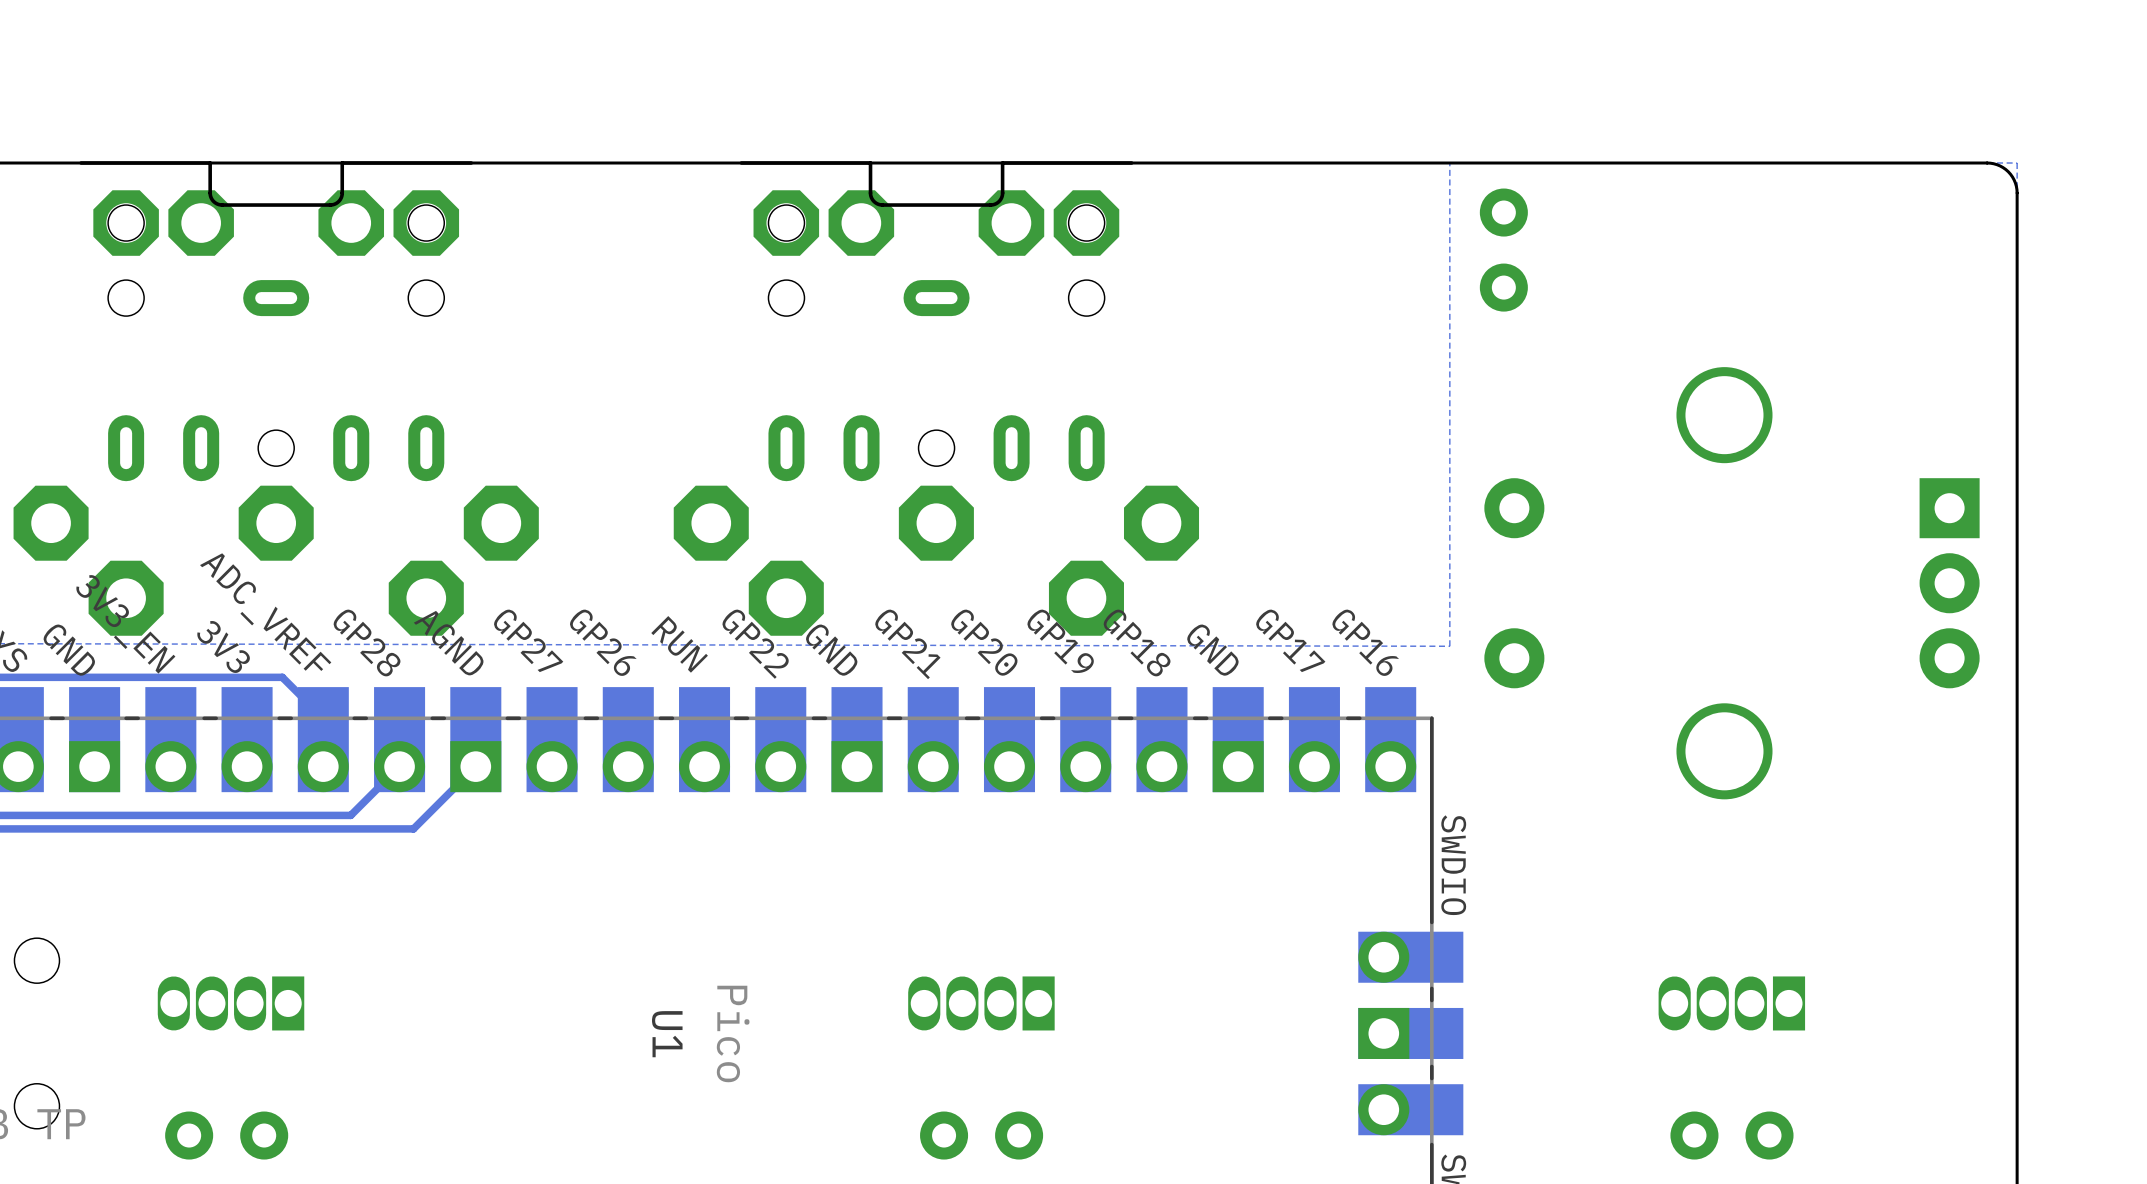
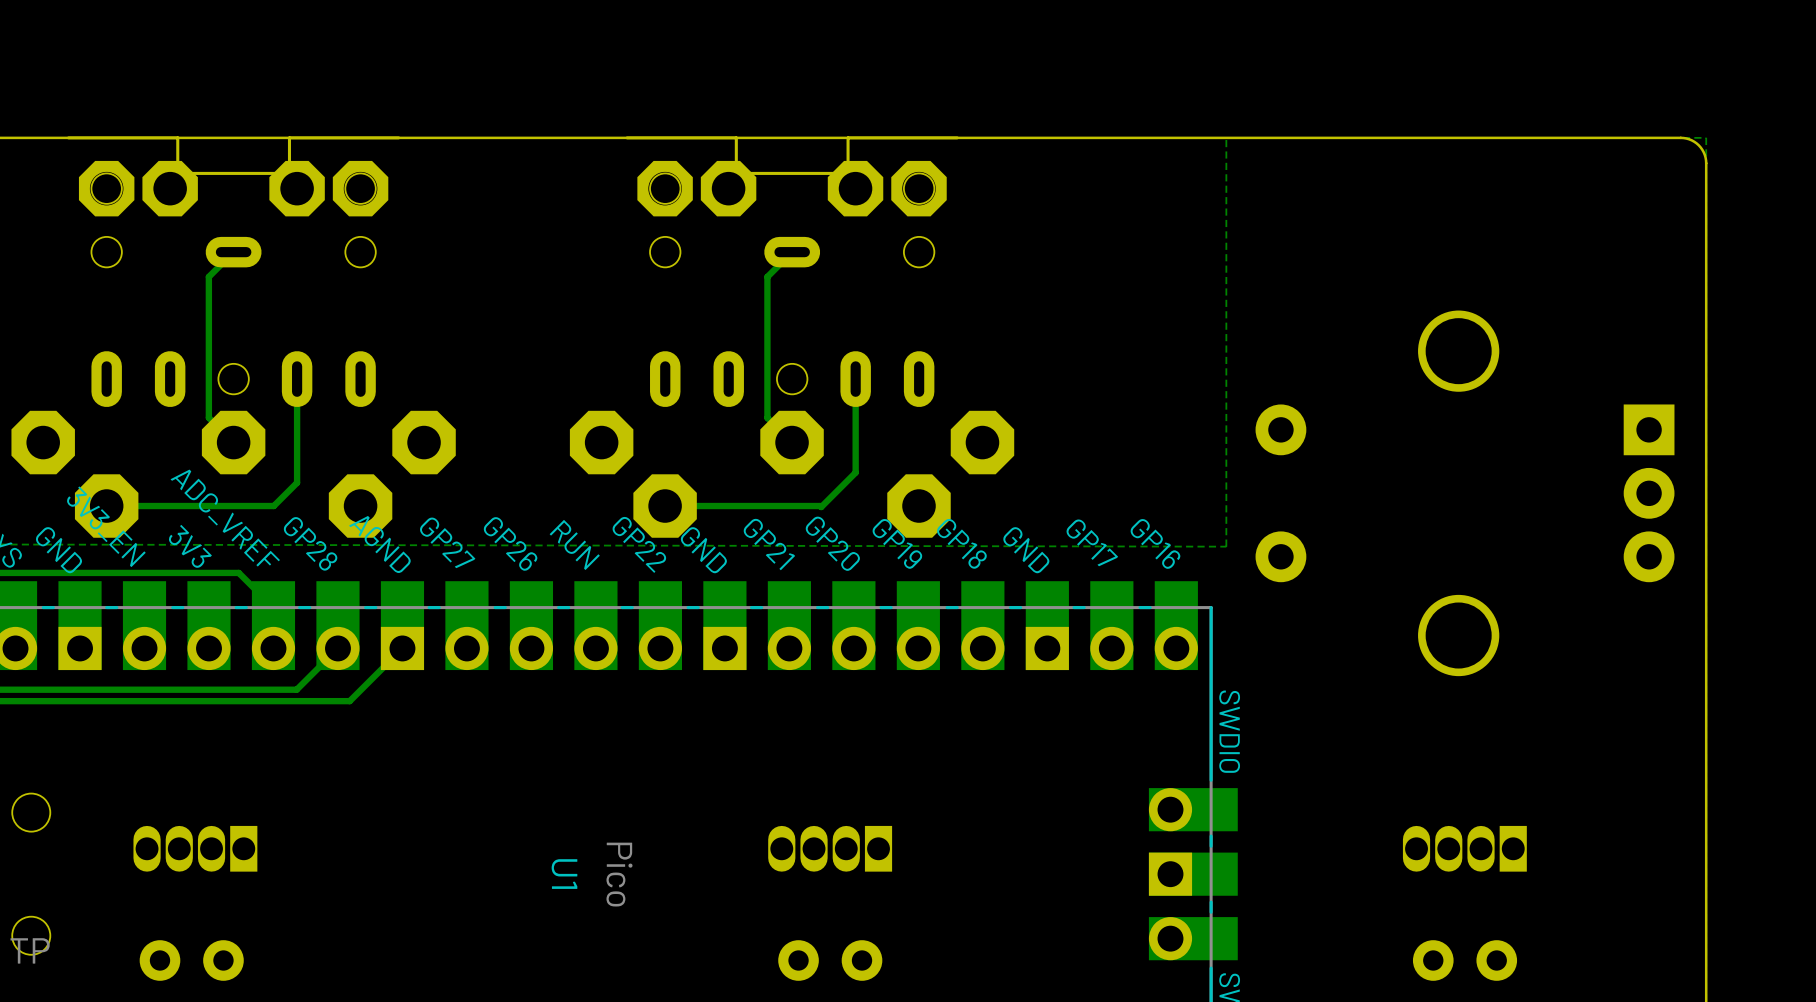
part: (1503, 250) -> none
track: none -> (233, 252) (208, 276) (208, 417) (233, 442)
track: none -> (792, 252) (767, 276) (767, 417) (792, 442)
track: none -> (297, 379) (297, 482) (273, 506) (106, 506)
track: none -> (855, 379) (855, 472) (821, 507) (665, 506)

